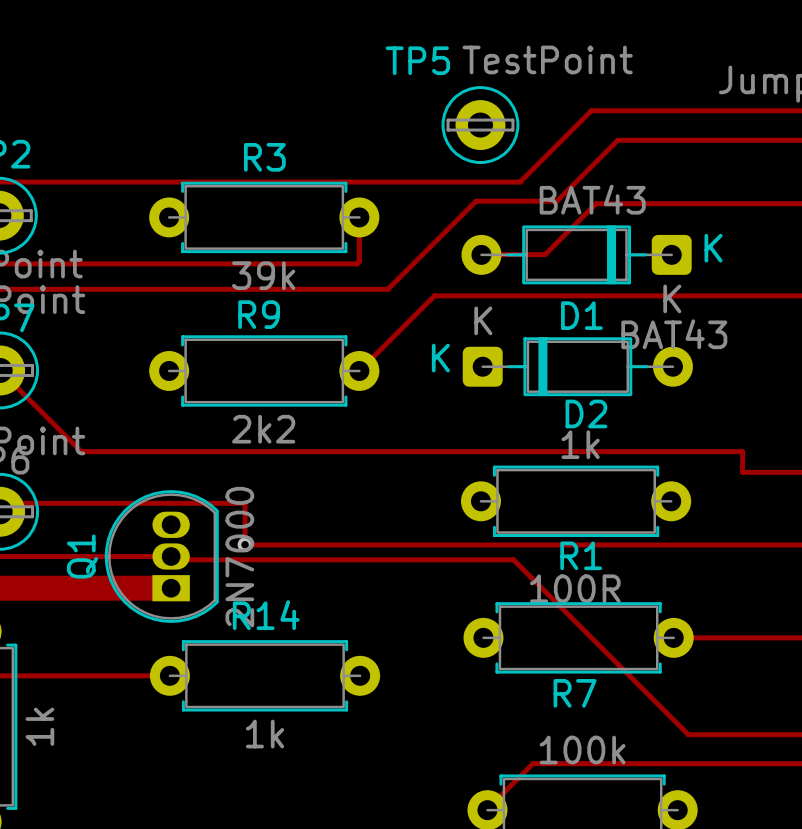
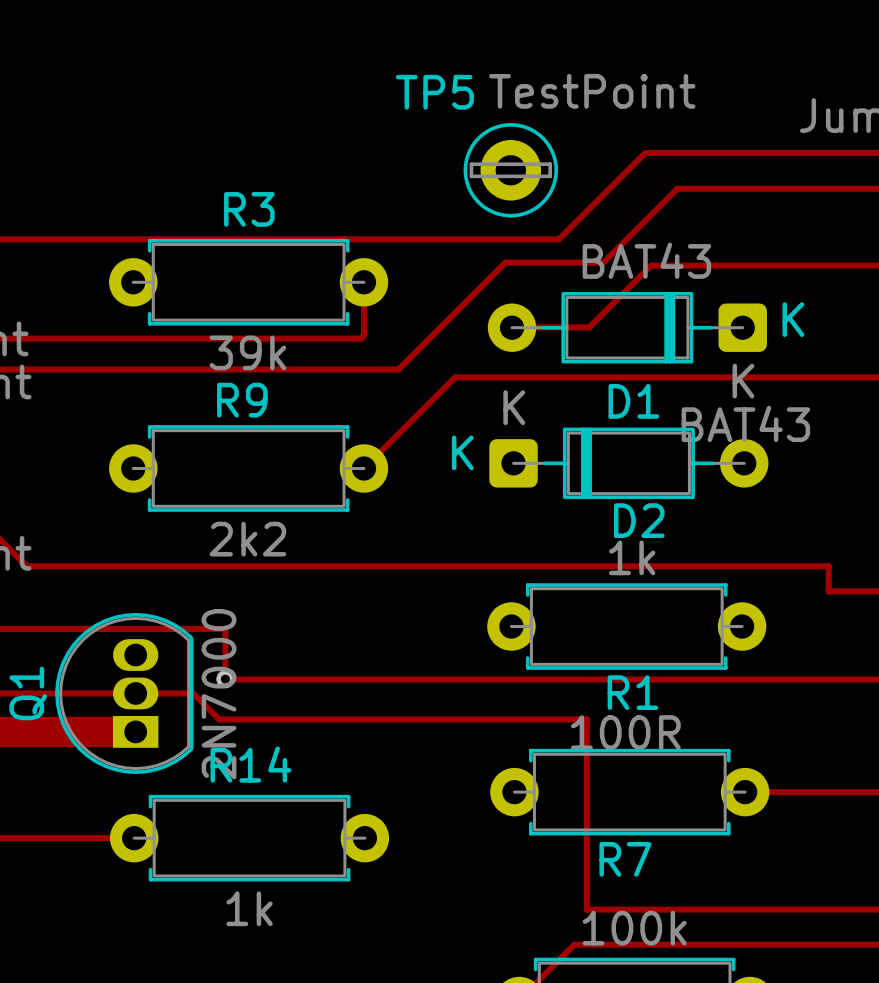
track: (171, 556) (174, 559) (513, 559) (688, 734) -> (135, 693) (193, 693) (219, 719) (586, 719) (586, 909) (762, 909)

